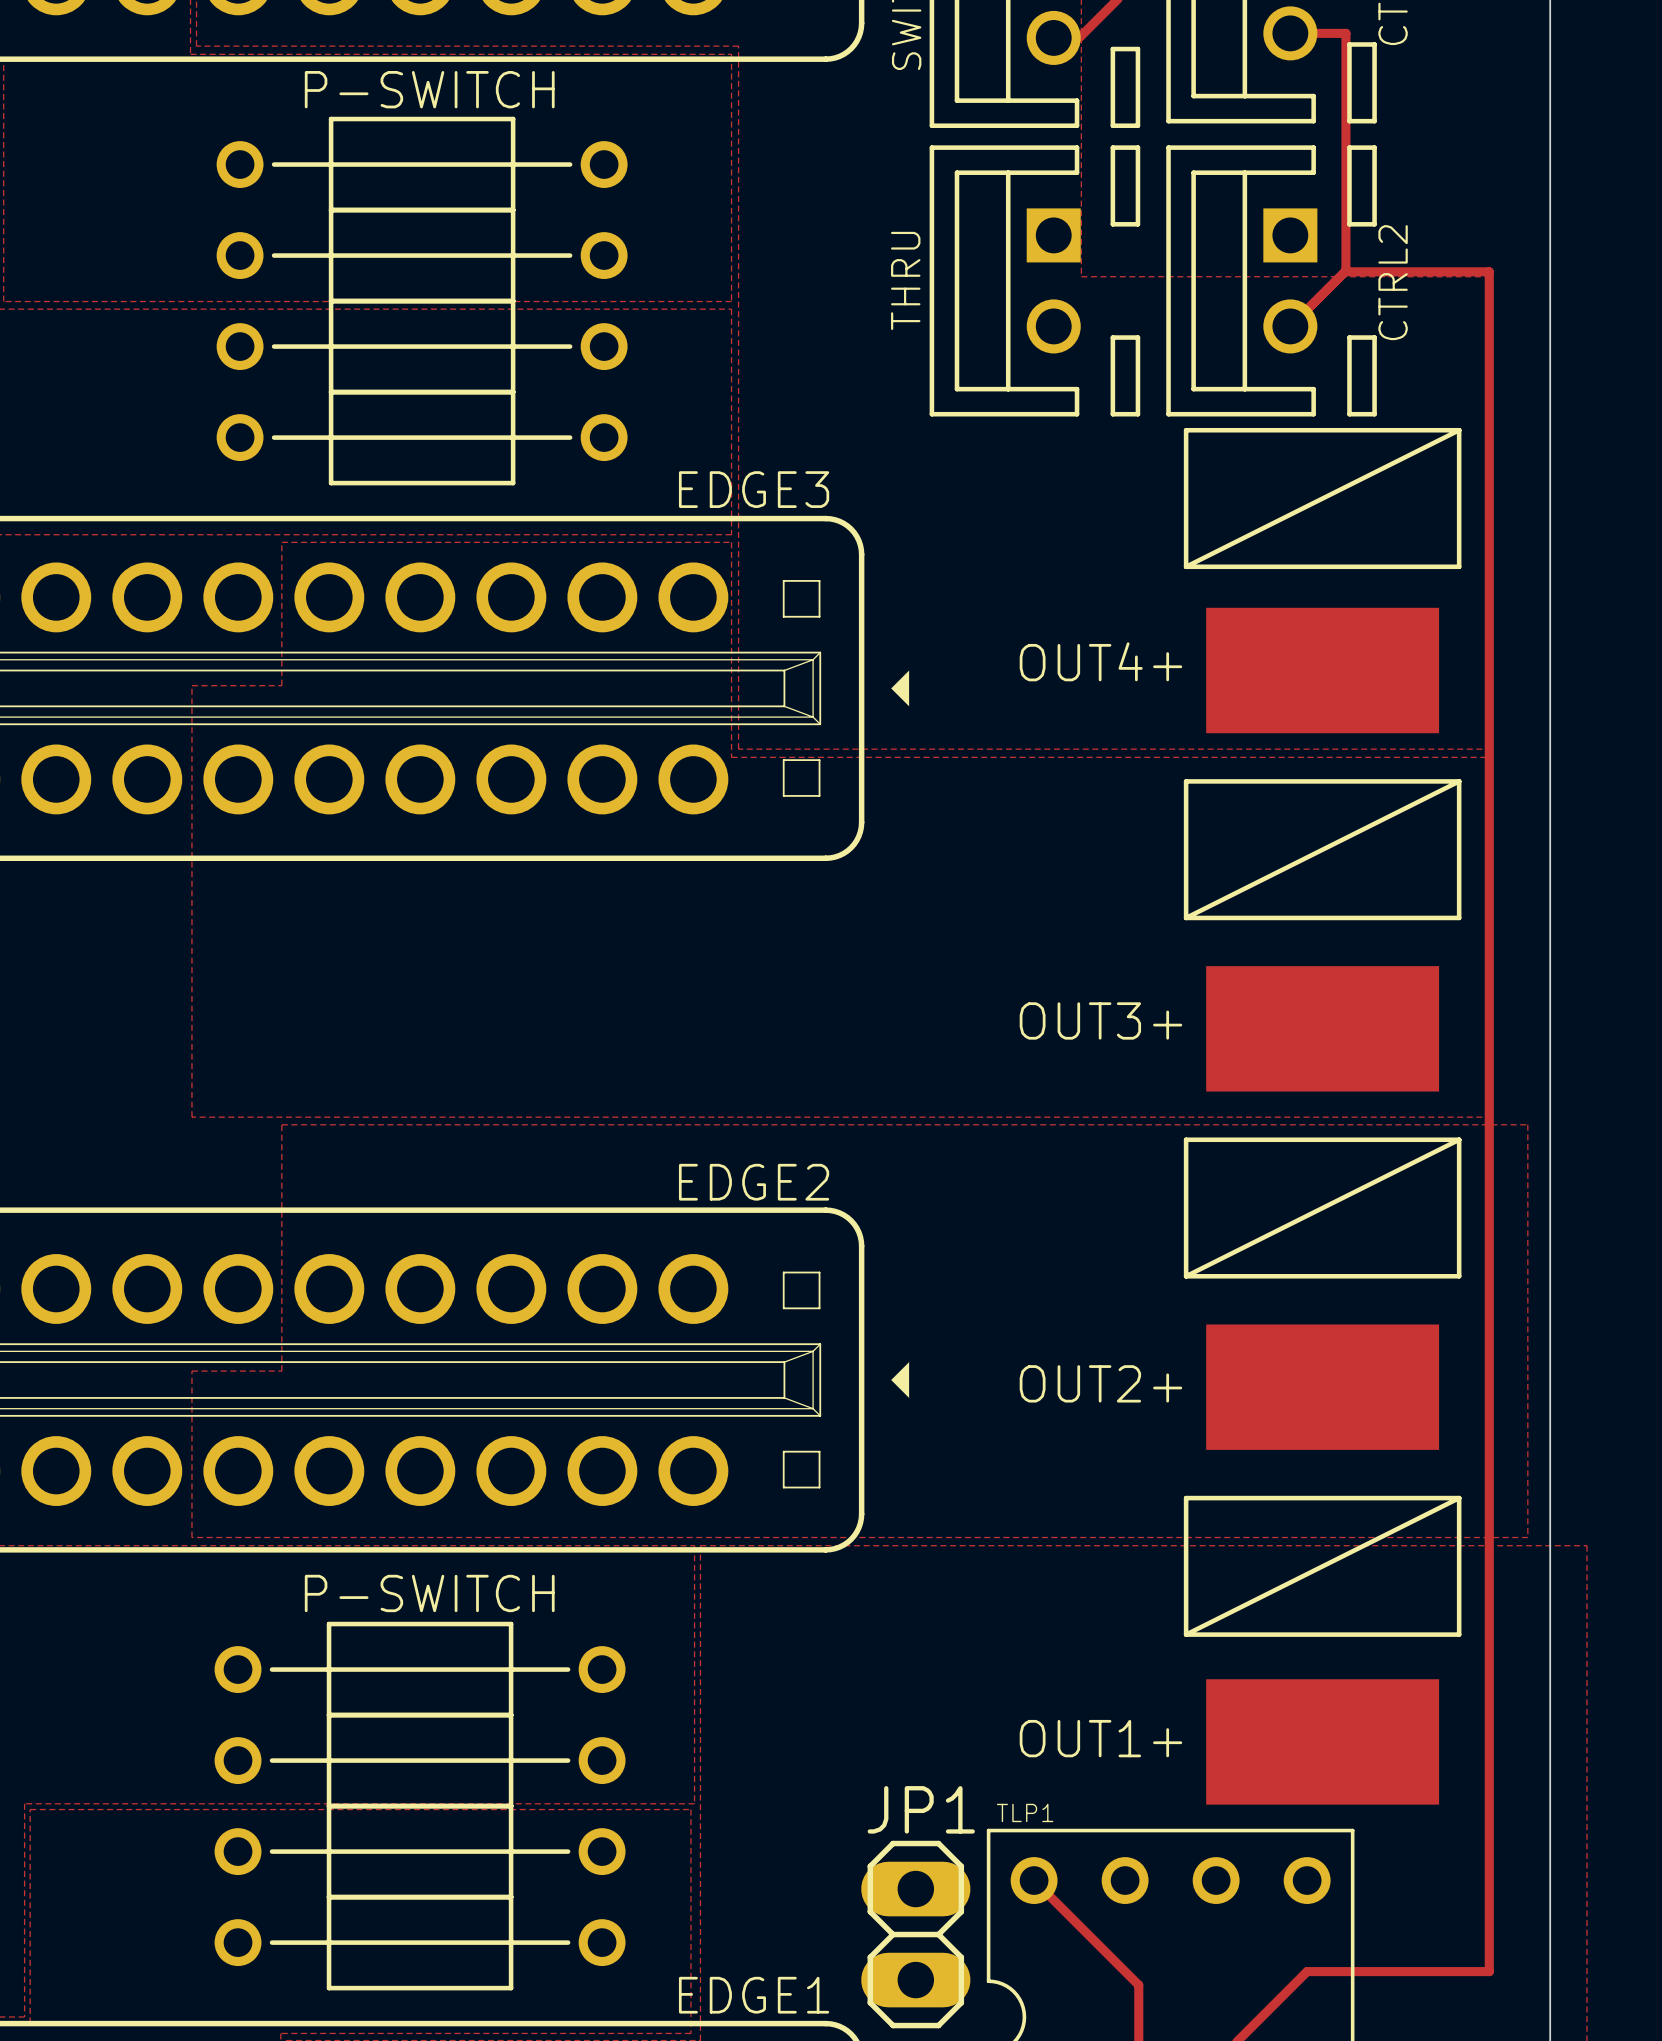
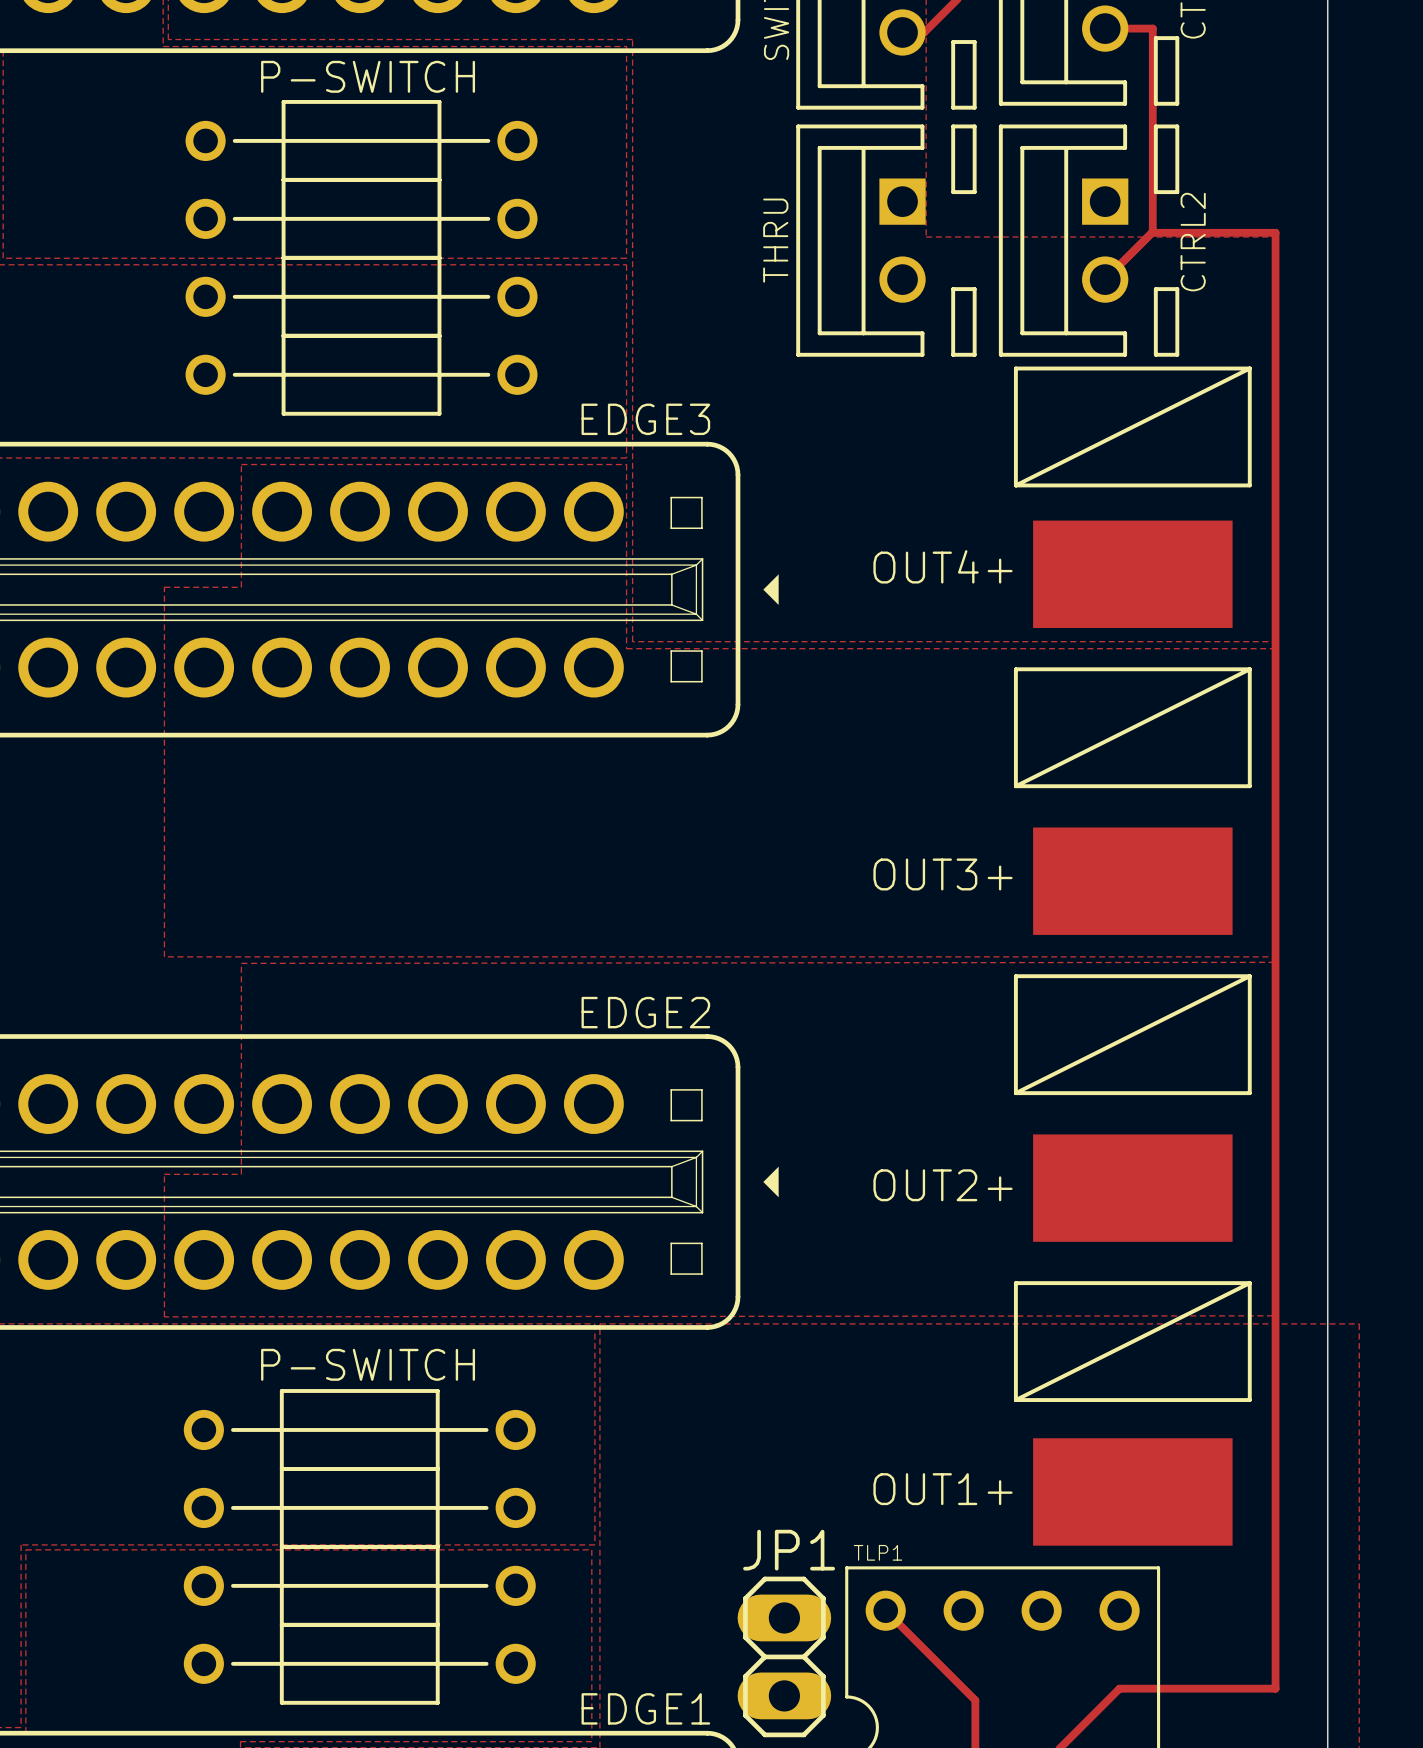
zone outline: (281, 1124) (1527, 1124) (1527, 1537) (191, 1537) -> (241, 963) (1273, 962) (1273, 1315) (164, 1316)

